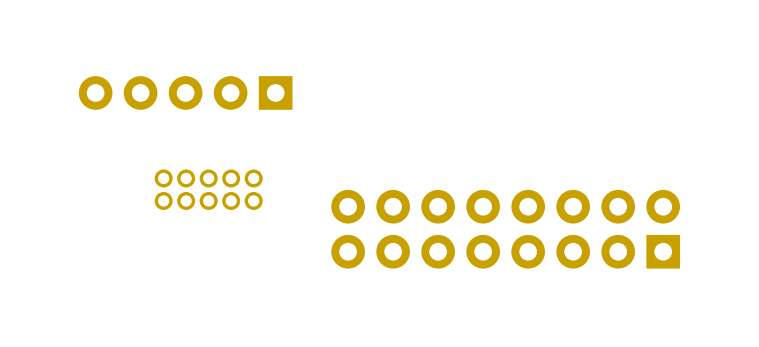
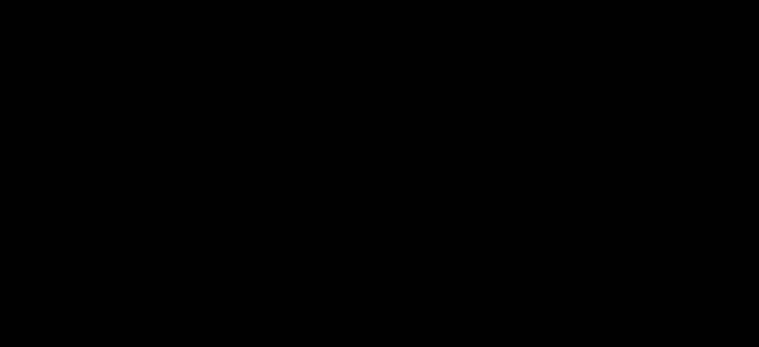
part: (185, 92) -> none
part: (208, 189) -> none
part: (505, 229) -> none

